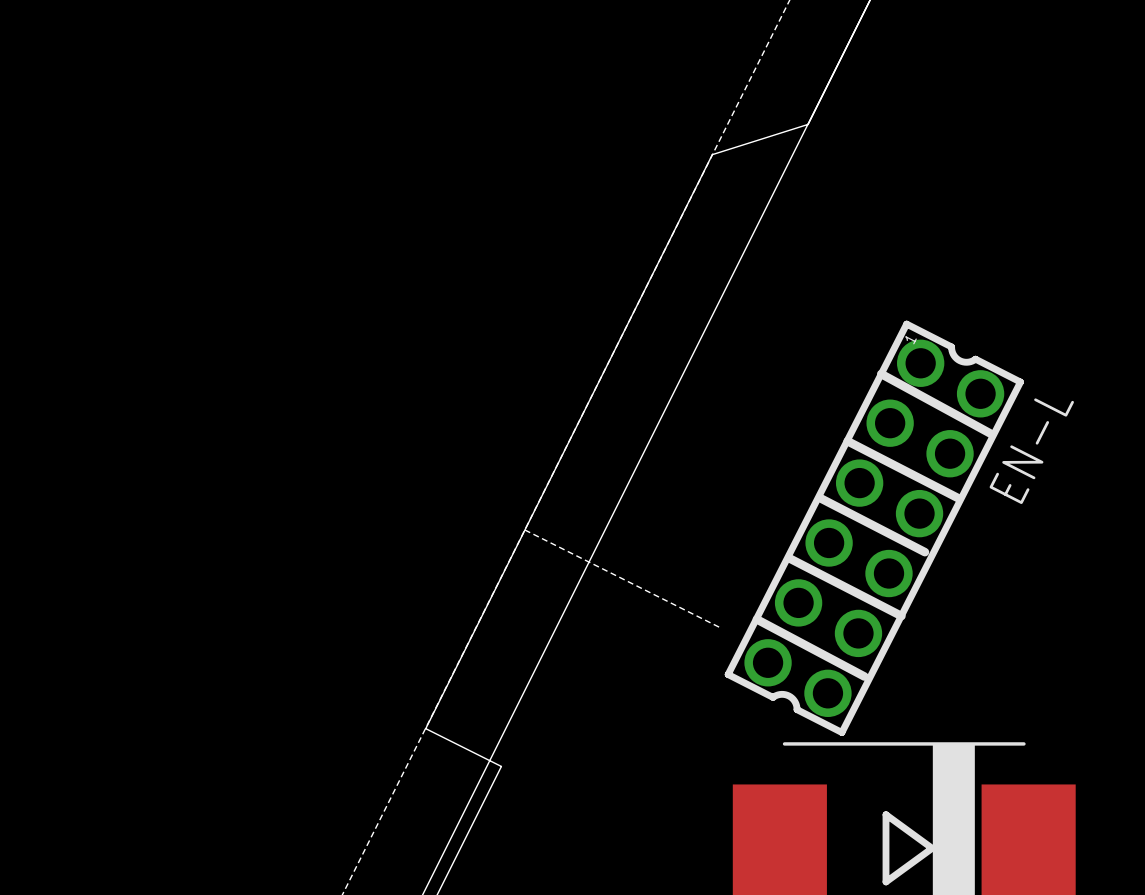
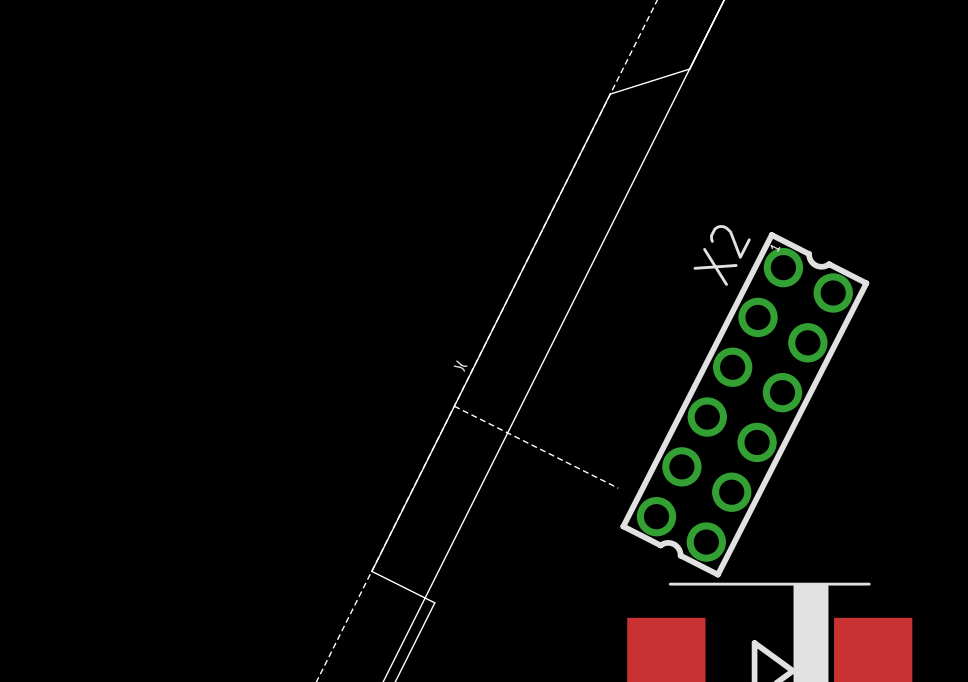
line: (881, 374) (992, 434) -> none
line: (847, 441) (958, 498) -> none
EN-L name: EN-L (1031, 451) -> X2 (722, 255)
part: none -> (460, 366)
line: (820, 498) (924, 552) -> none
line: (790, 558) (901, 616) -> none
line: (756, 619) (864, 676) -> none

